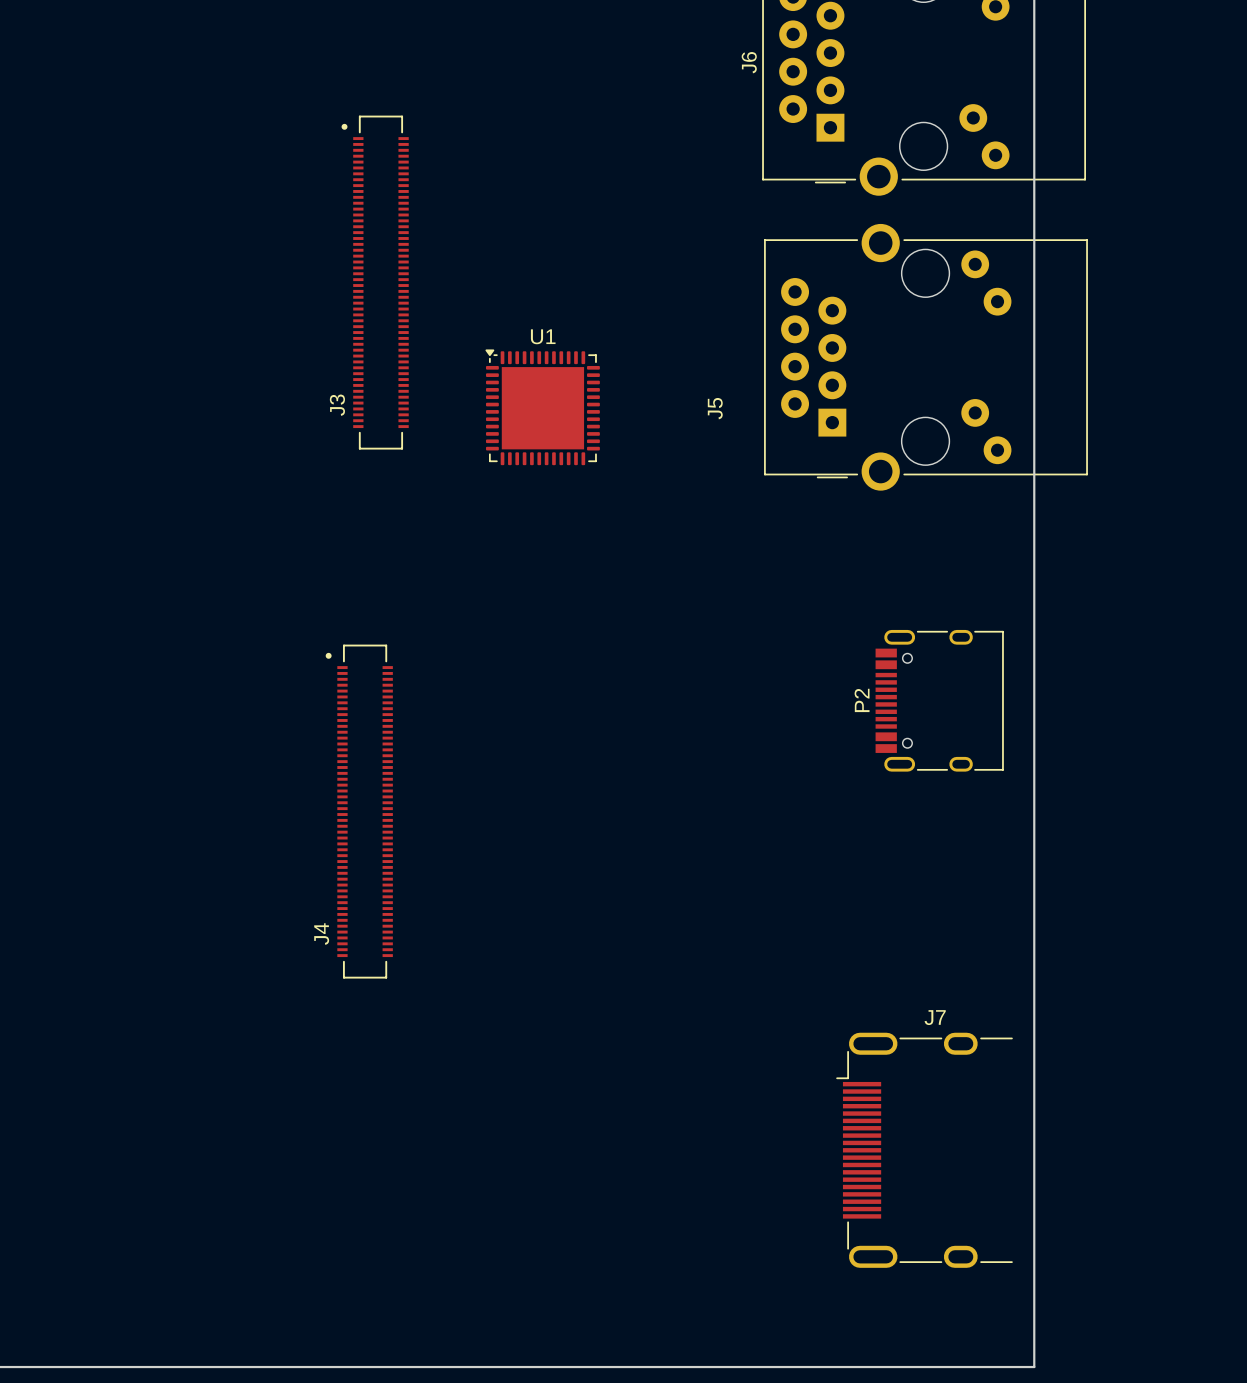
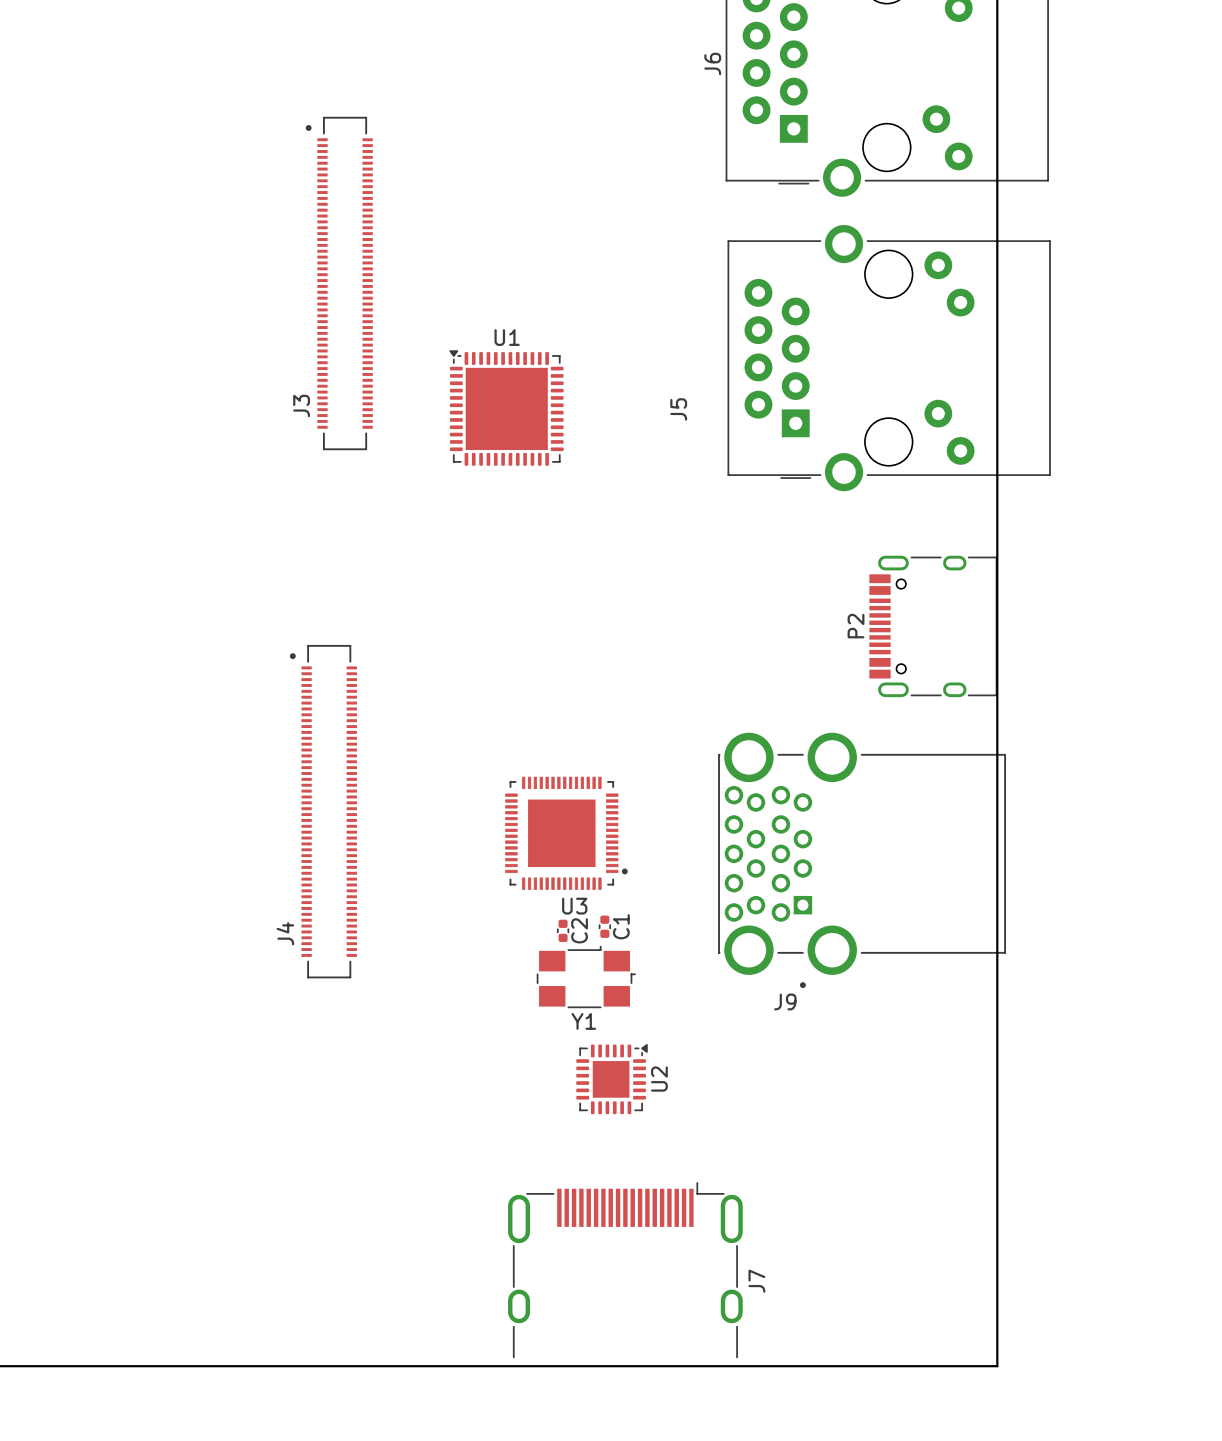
P2 position: (939, 700) -> (933, 626)
U3: none -> (566, 833)
J9: none -> (862, 860)
C1: none -> (604, 926)
C2: none -> (563, 930)
Y1: none -> (586, 976)
U2: none -> (612, 1079)
J7 rotation: 0° (924, 1150) -> 90° clockwise (625, 1270)
J7 position: (924, 1150) -> (625, 1270)

